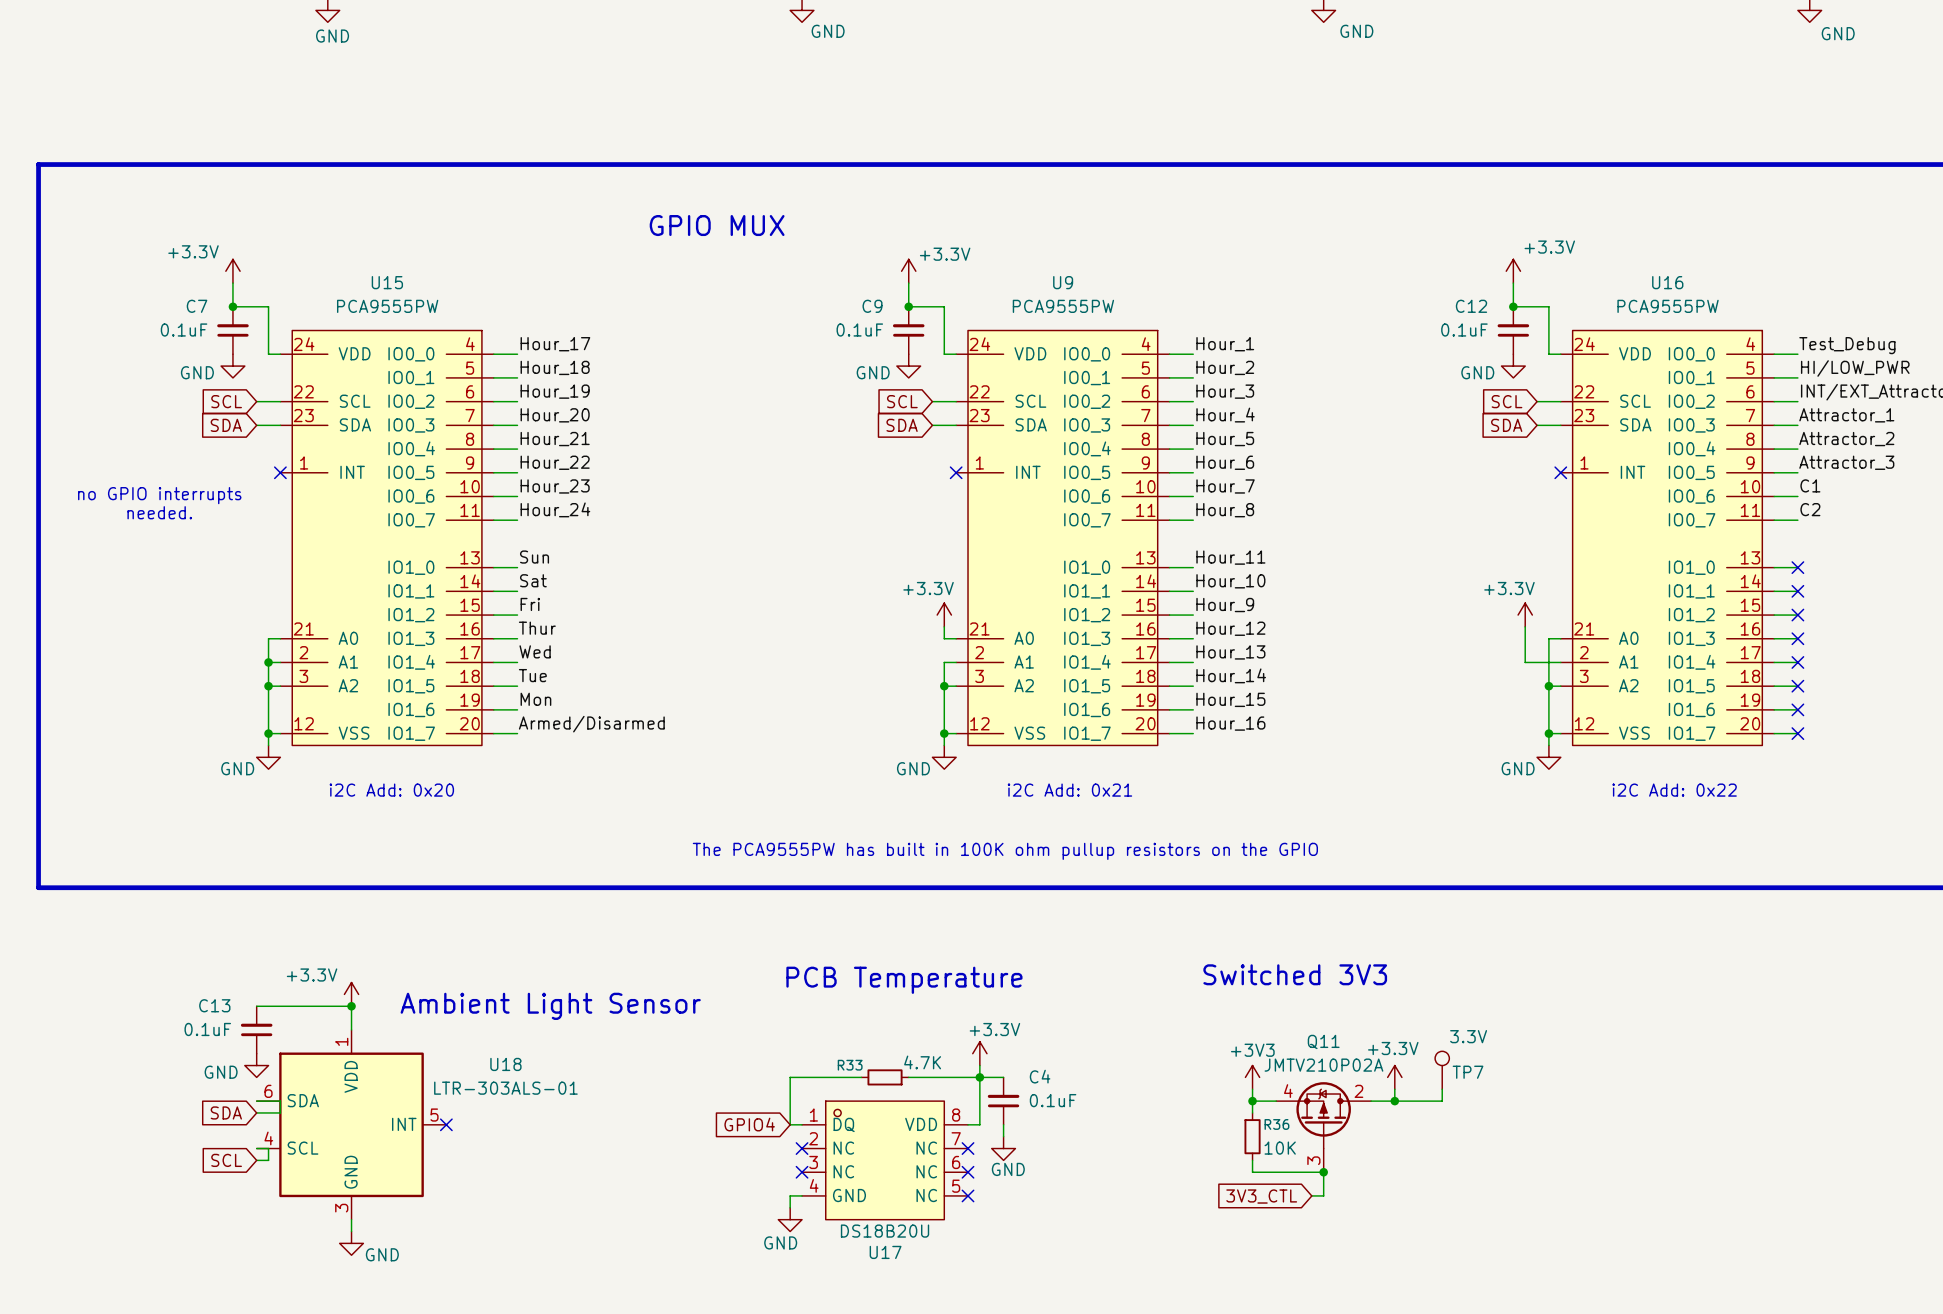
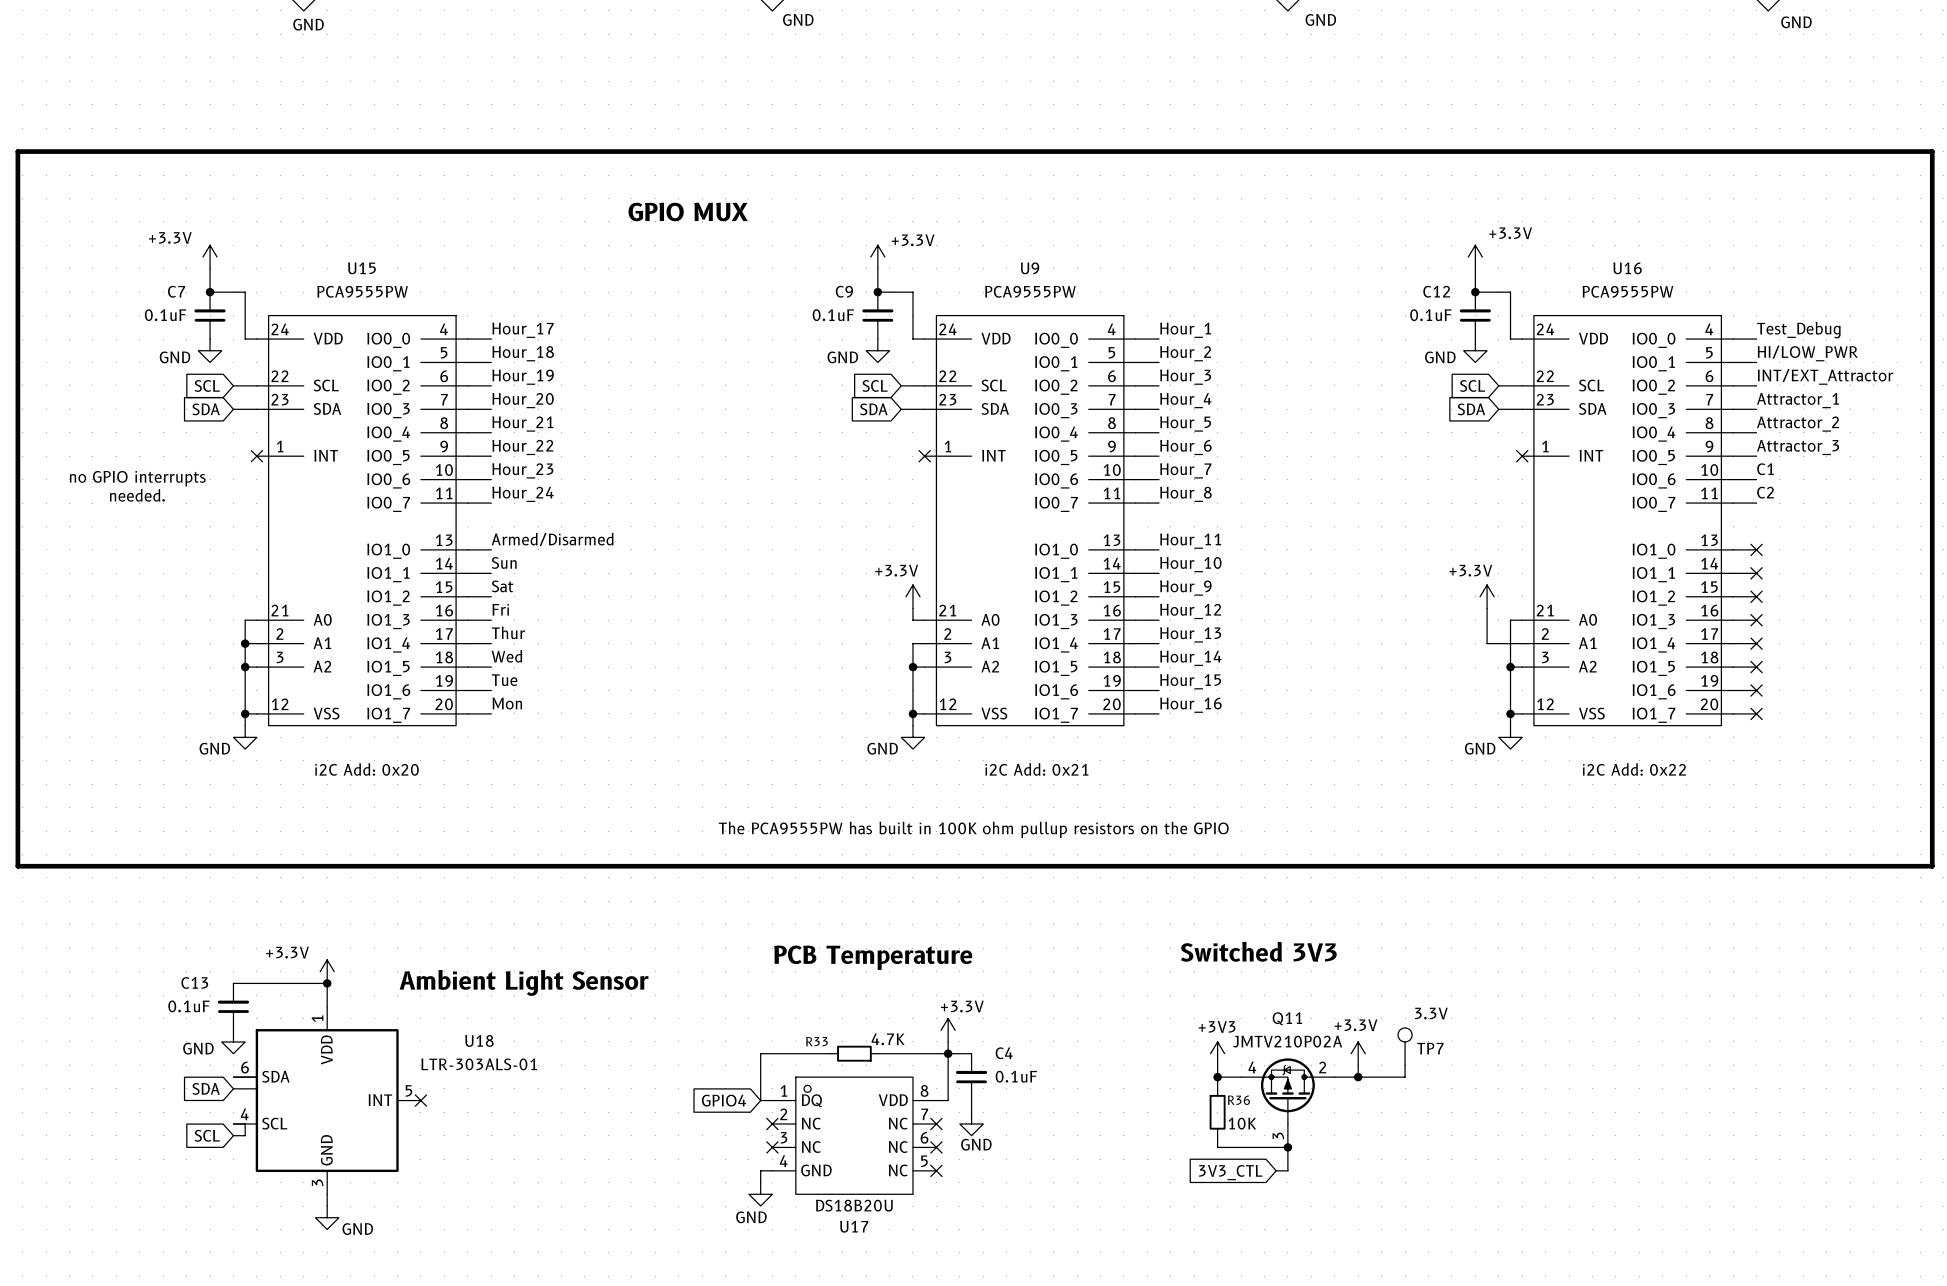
label: Sun (534, 557) -> Armed/Disarmed (552, 539)
label: Sat (533, 580) -> Sun (504, 562)
label: Fri (530, 604) -> Sat (502, 586)
label: Thur (537, 628) -> Fri (500, 609)
label: Wed (535, 651) -> Thur (508, 632)
label: Tue (532, 675) -> Wed (506, 656)
label: Mon (535, 699) -> Tue (504, 680)
label: Armed/Disarmed (591, 724) -> Mon (507, 703)

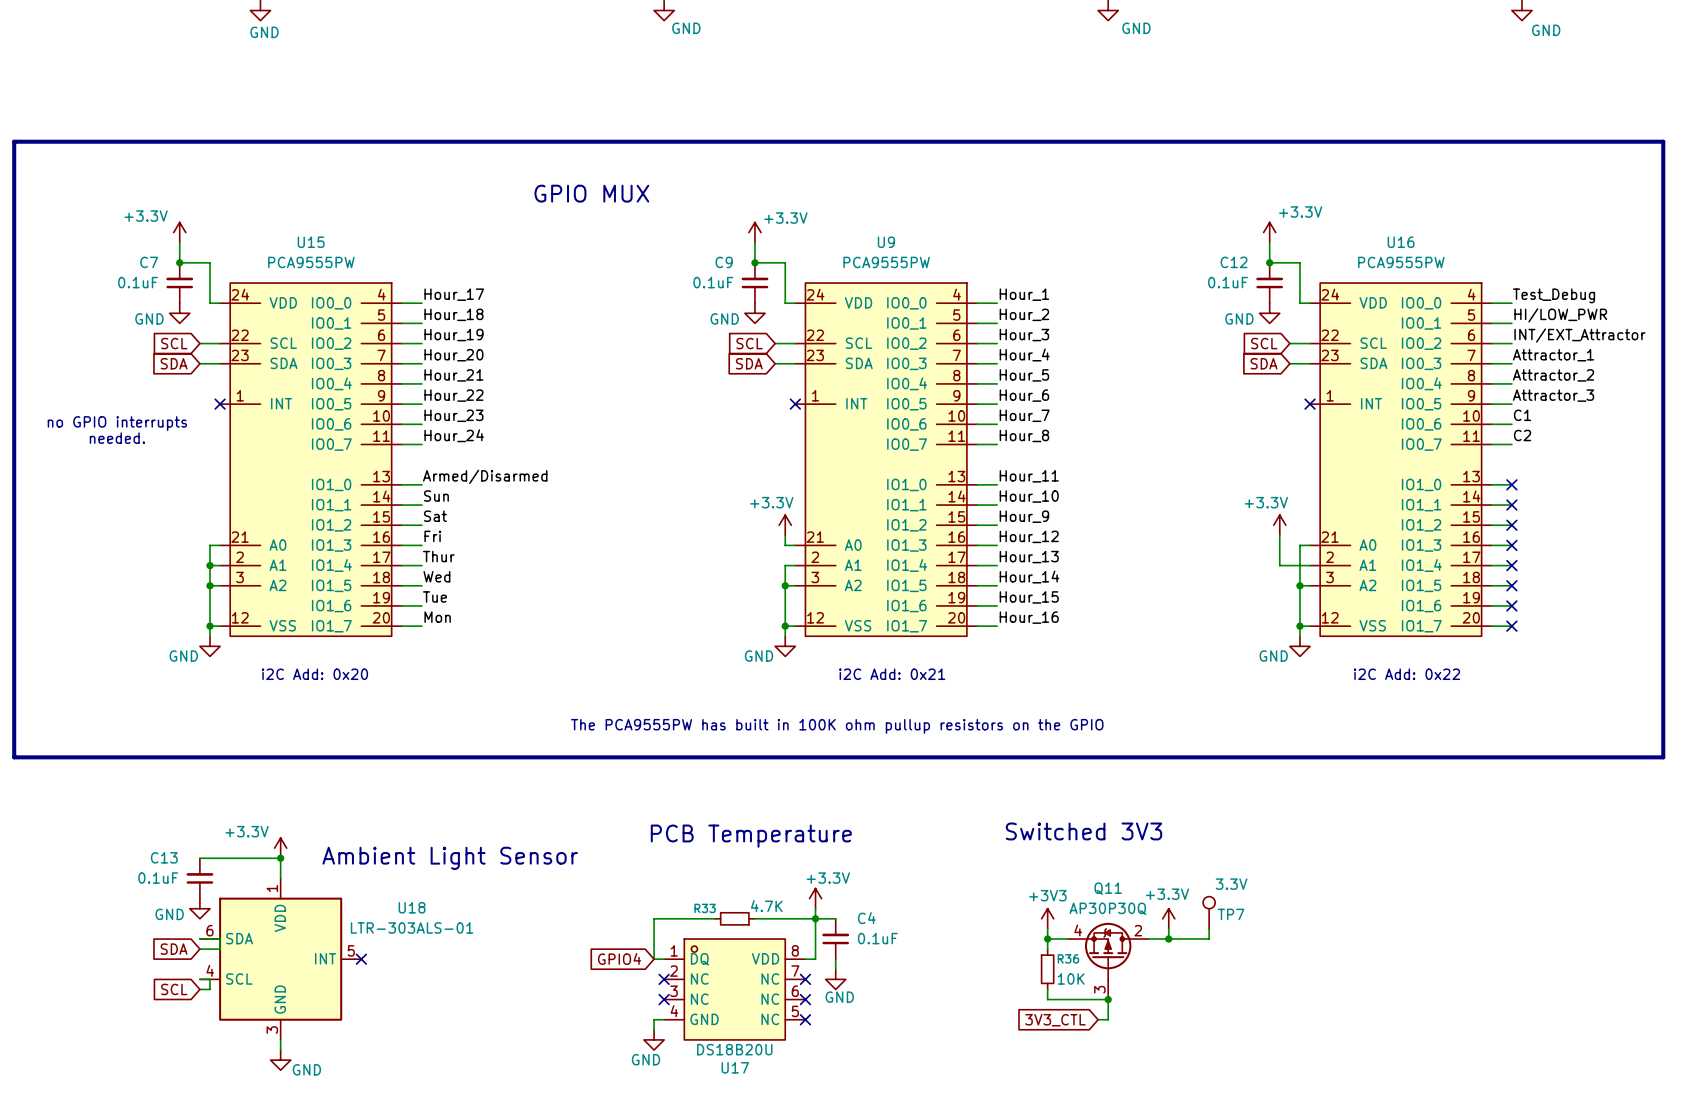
Q11 value: JMTV210P02A (1287, 1041) -> AP30P30Q (1107, 908)

